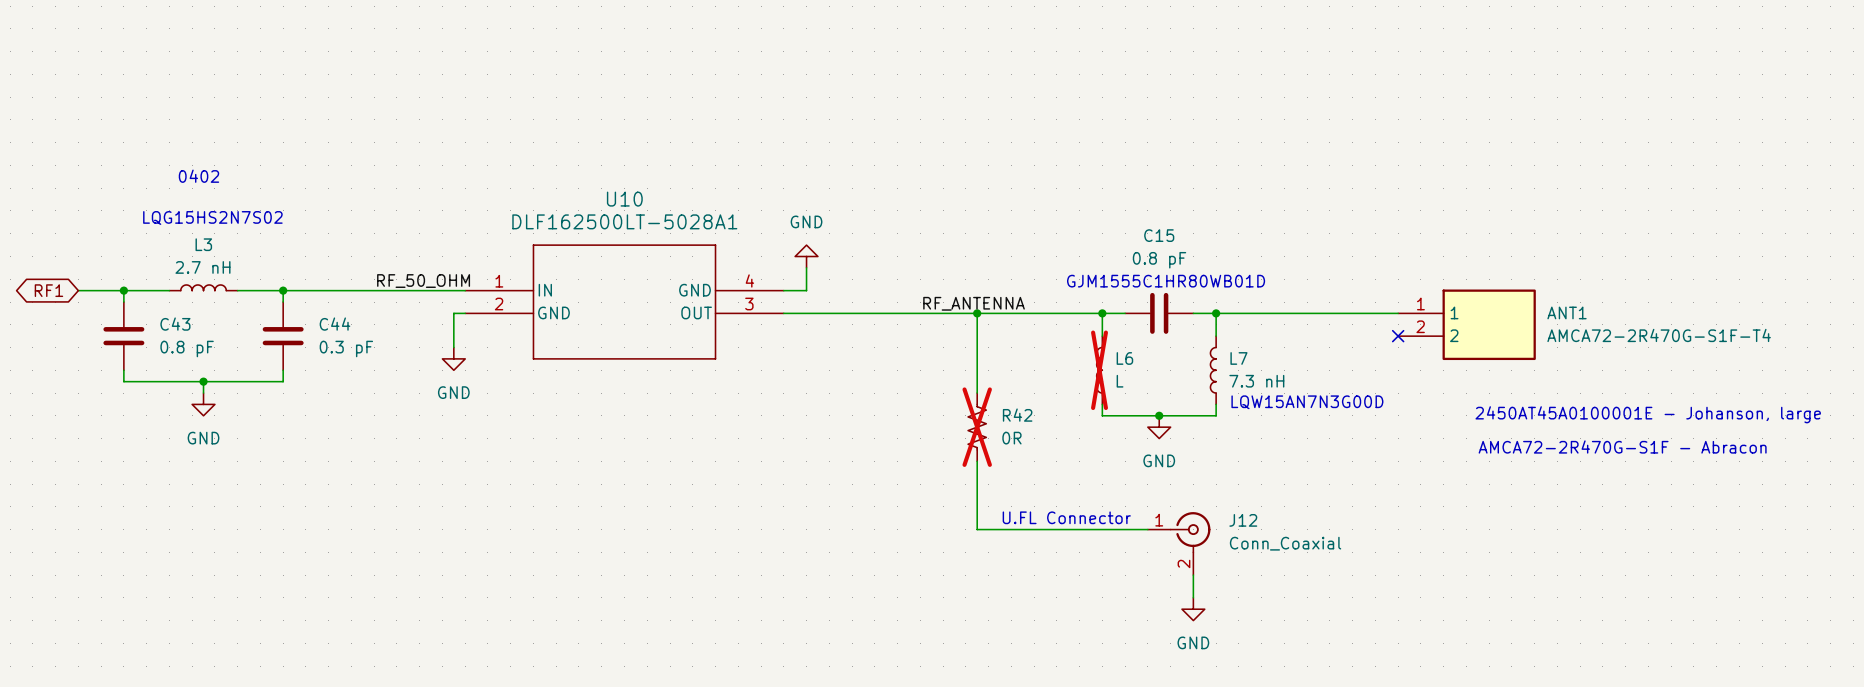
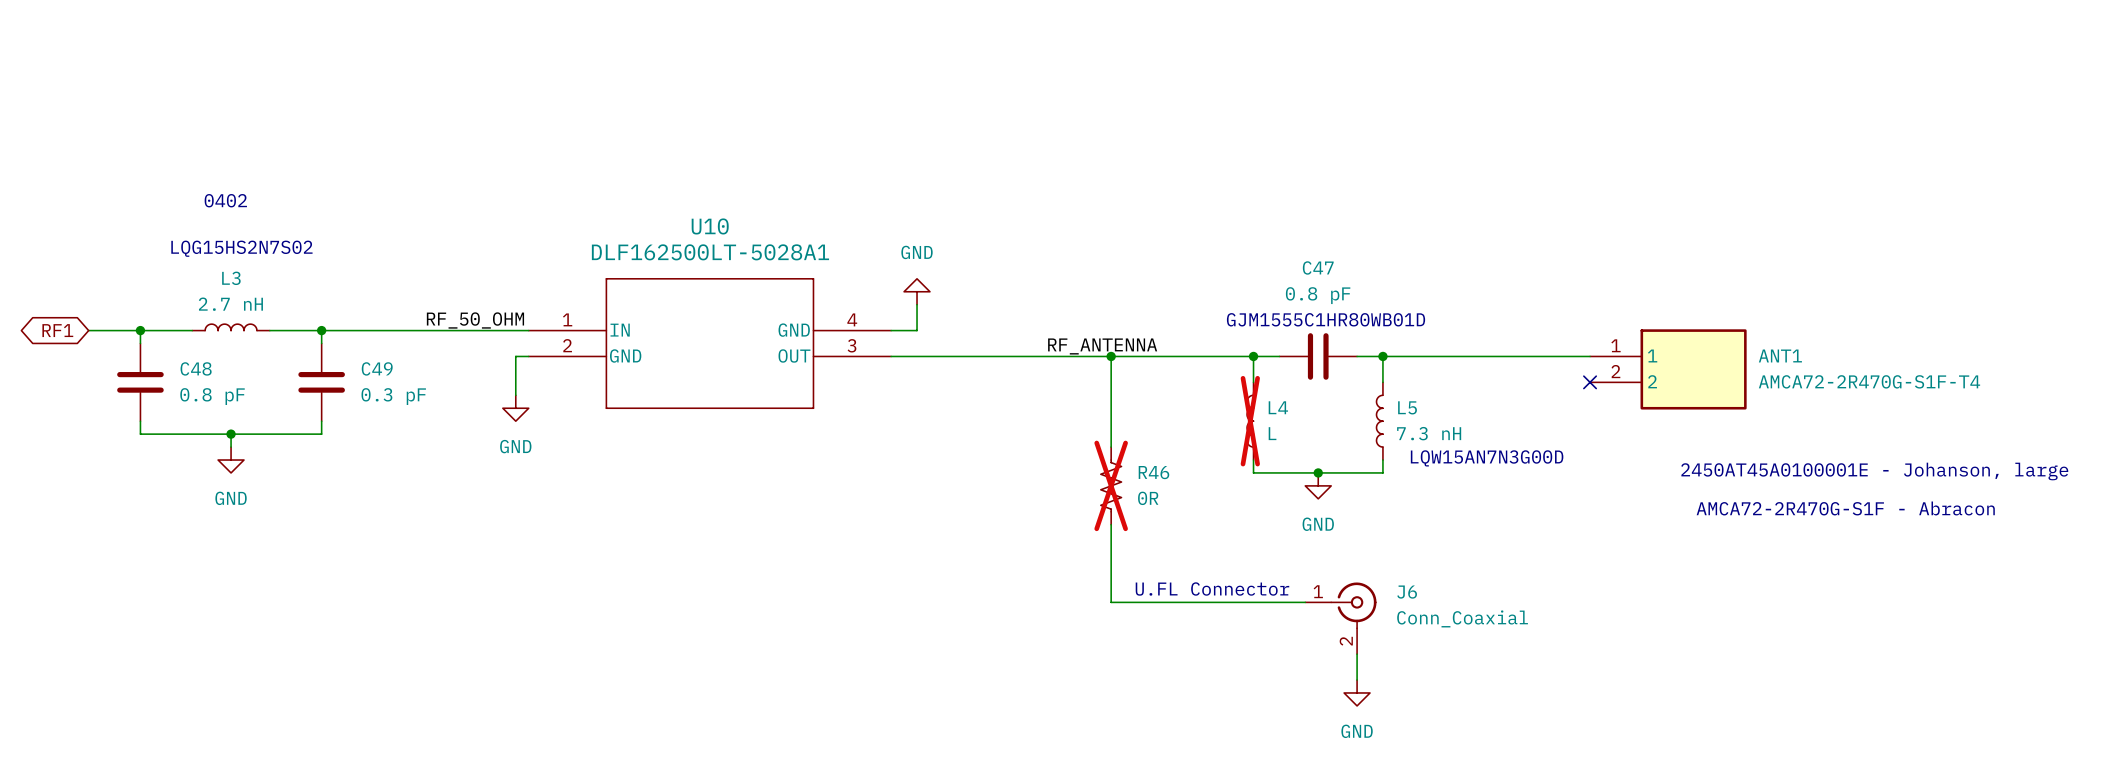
C15 name: C15 (1159, 235) -> C47 (1318, 267)
C43 name: C43 (175, 324) -> C48 (196, 368)
C44 name: C44 (334, 324) -> C49 (377, 368)
L6 name: L6 (1124, 358) -> L4 (1278, 407)
L7 name: L7 (1238, 358) -> L5 (1407, 407)
R42 name: R42 (1017, 415) -> R46 (1153, 472)
J12 name: J12 (1243, 520) -> J6 (1407, 592)

